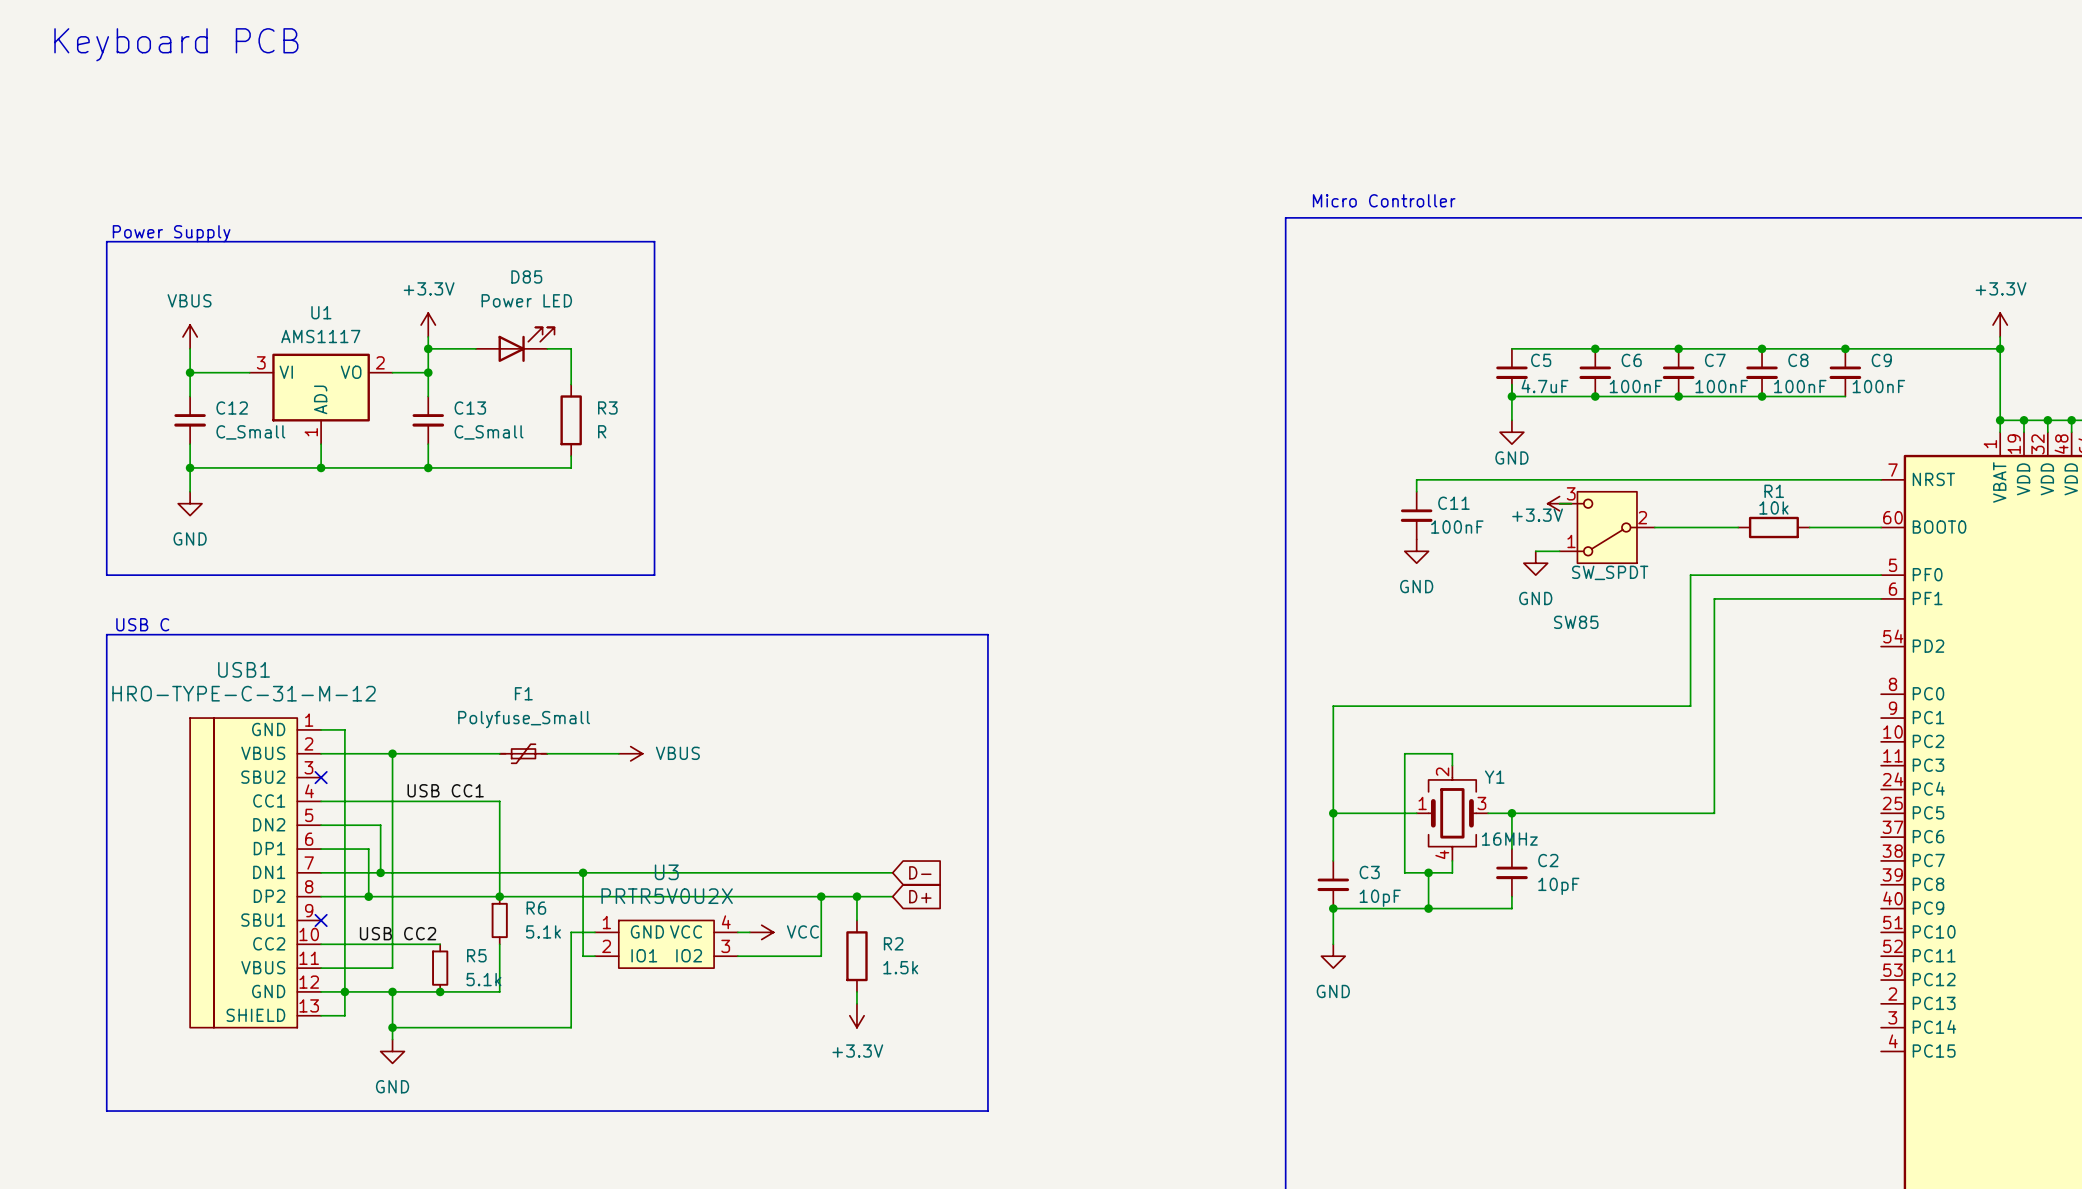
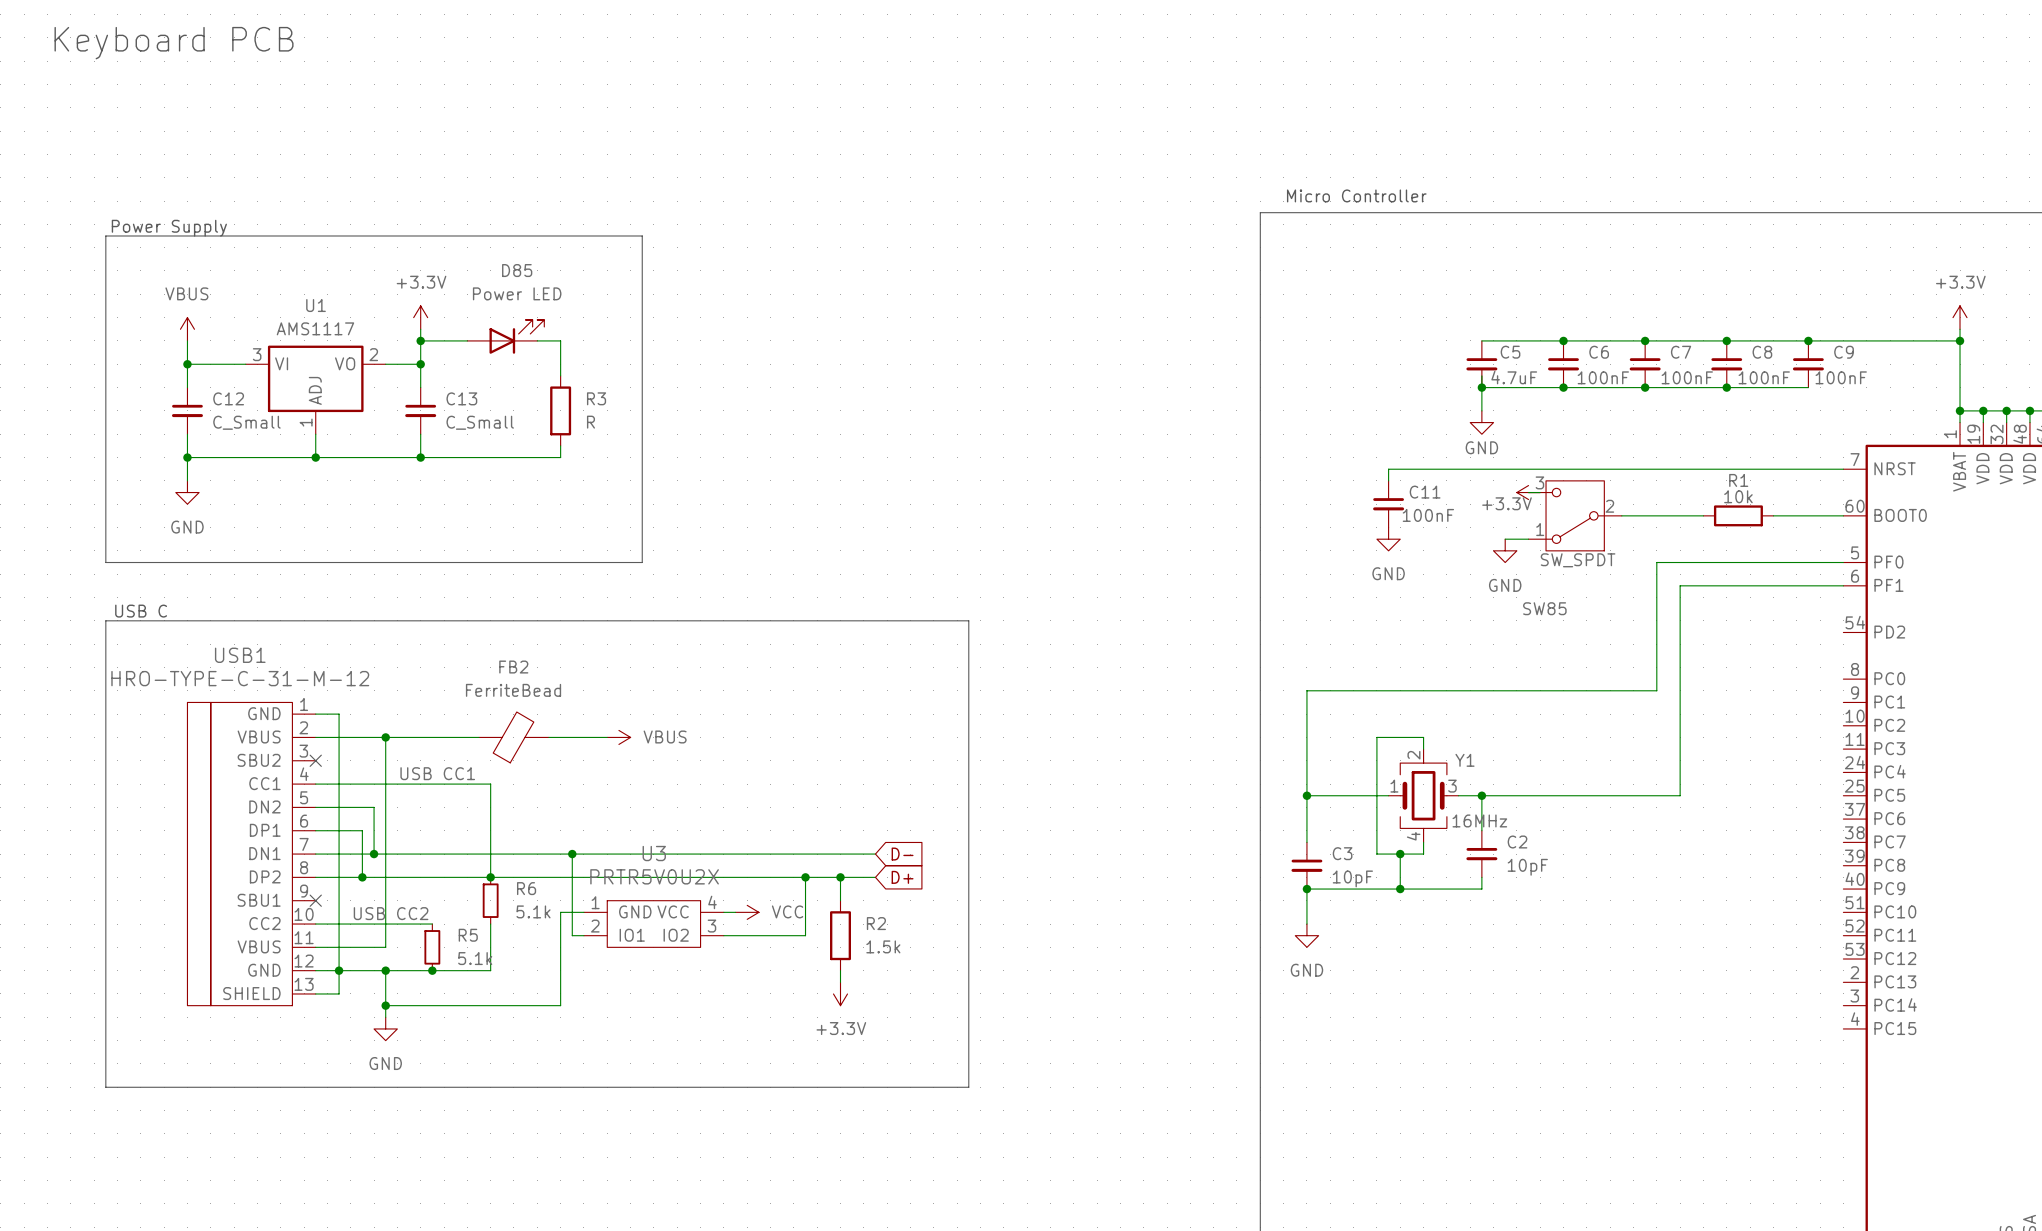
F1: Polyfuse_Small (523, 753) -> none
FB2: none -> FerriteBead (513, 737)

